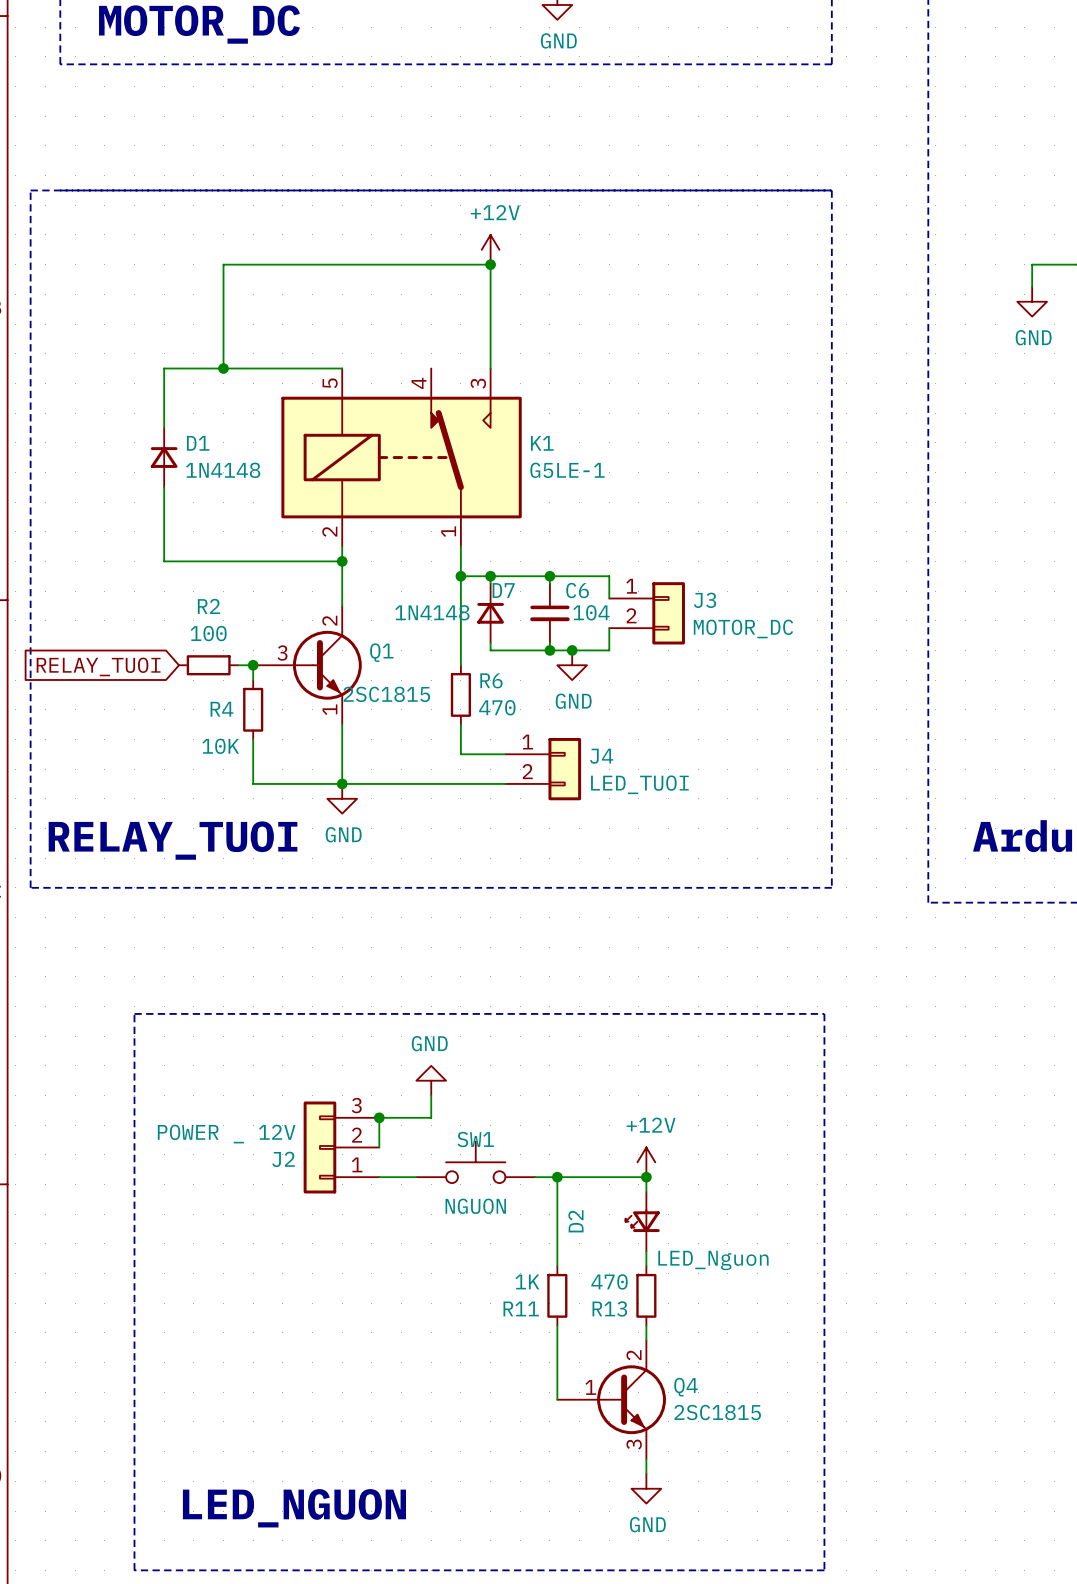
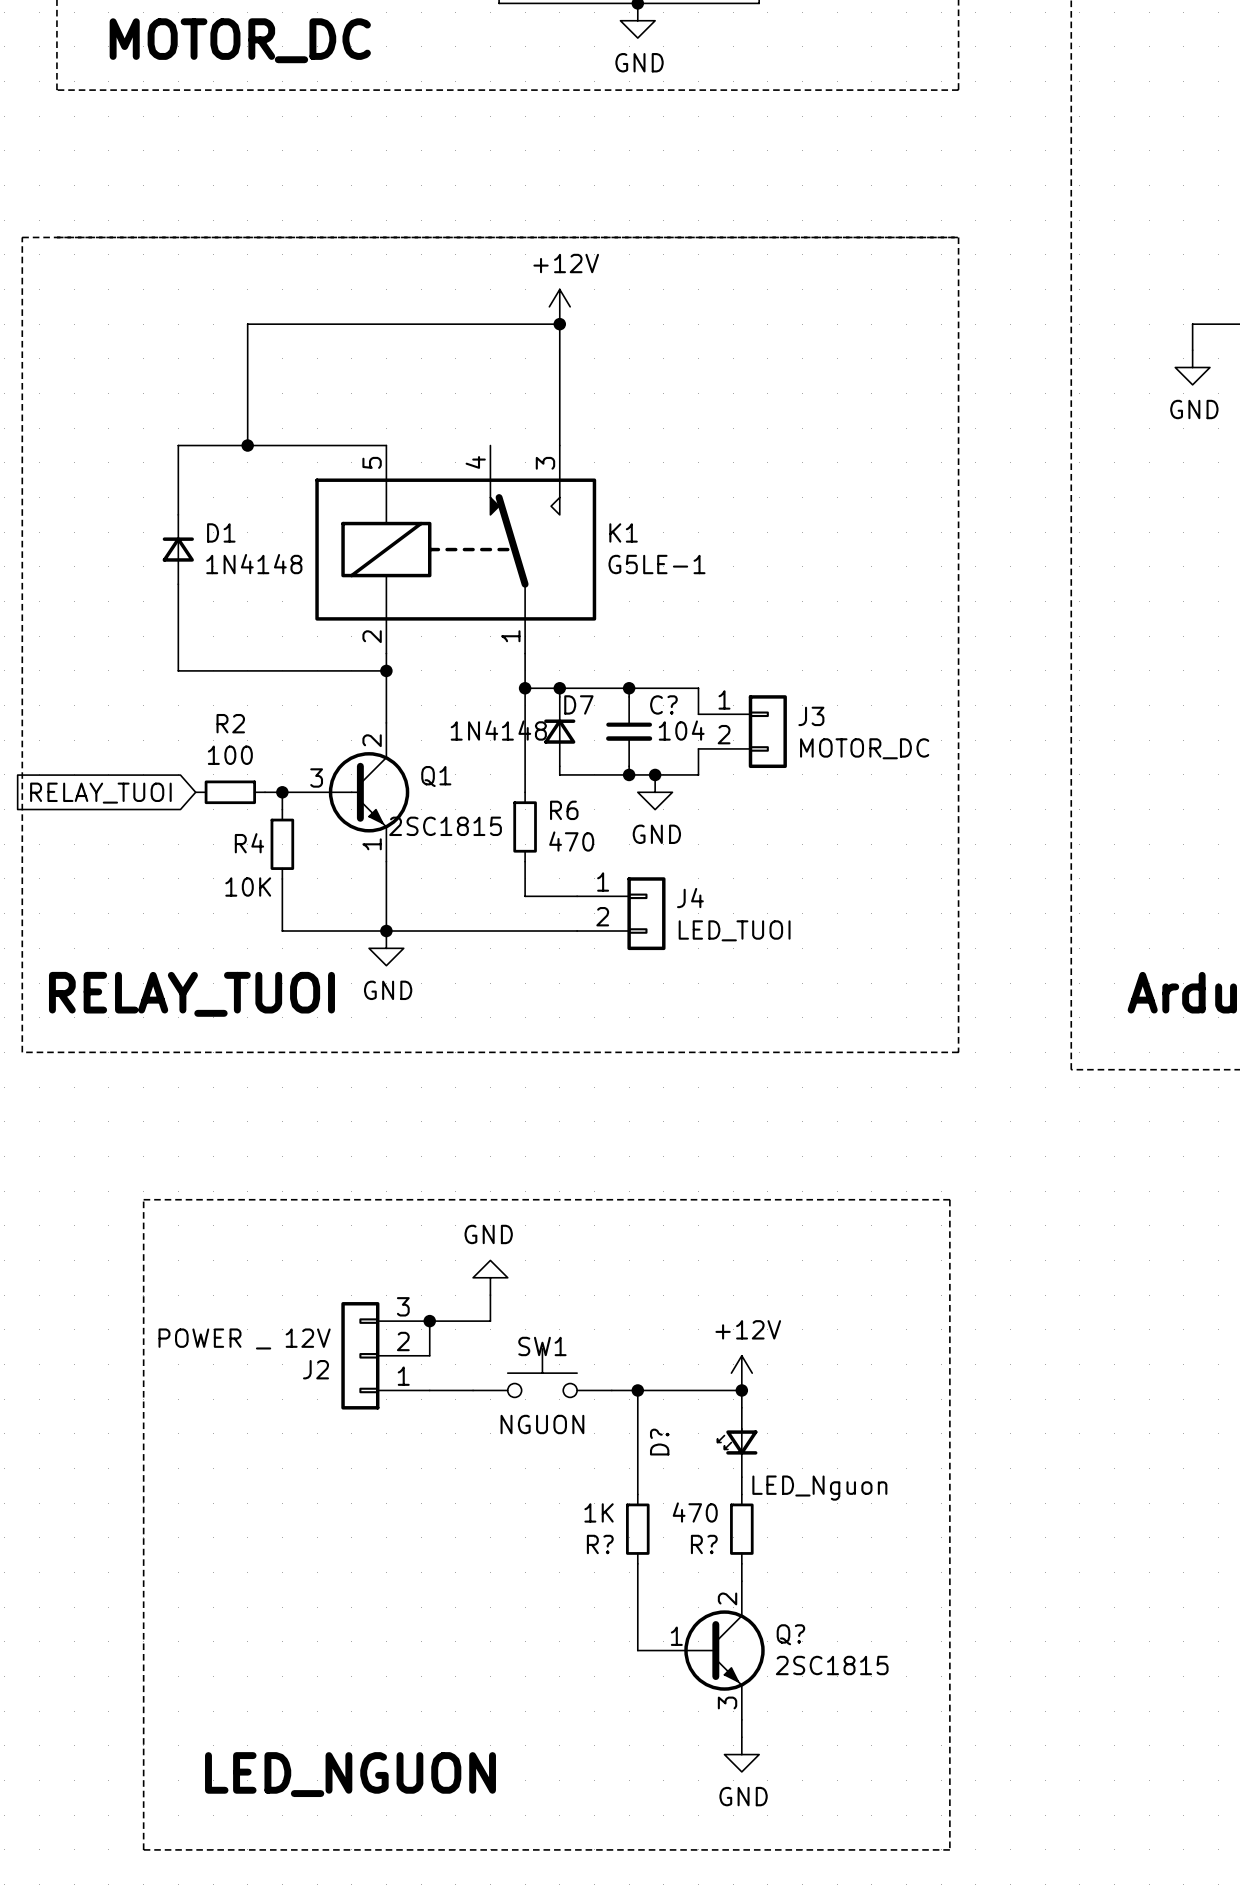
C6 name: C6 (577, 590) -> C? (663, 704)
D2 name: D2 (575, 1221) -> D? (659, 1442)
R11 name: R11 (521, 1308) -> R? (600, 1544)
R13 name: R13 (609, 1308) -> R? (704, 1544)
Q4 name: Q4 (686, 1387) -> Q? (790, 1634)

